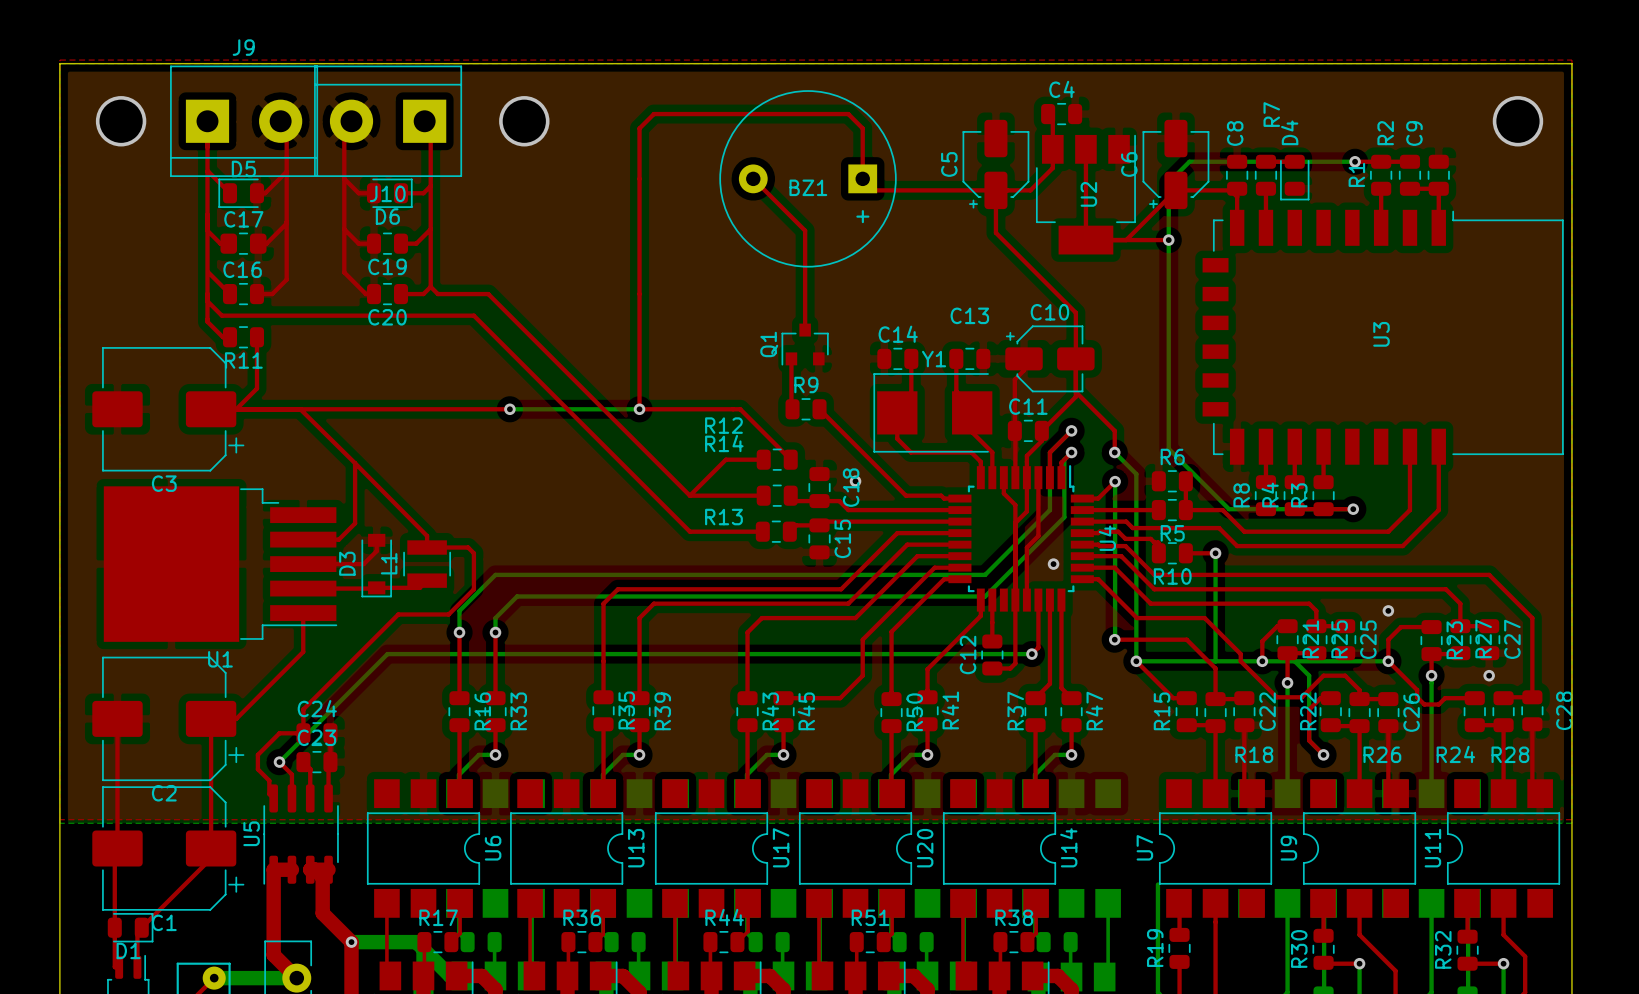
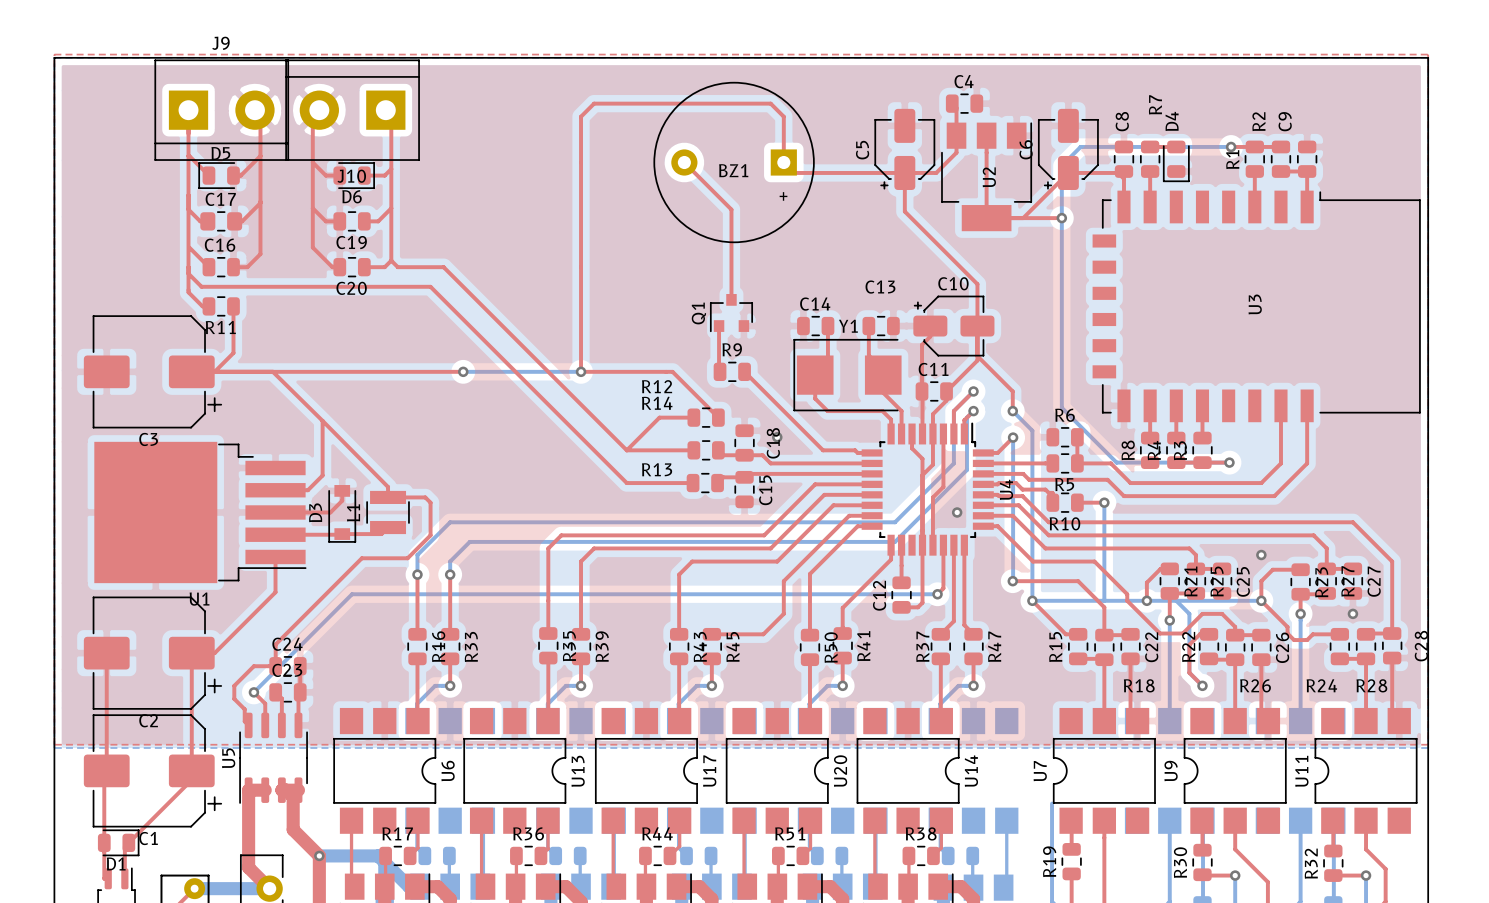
via: (121, 121) -> none
via: (524, 121) -> none
via: (1517, 121) -> none

